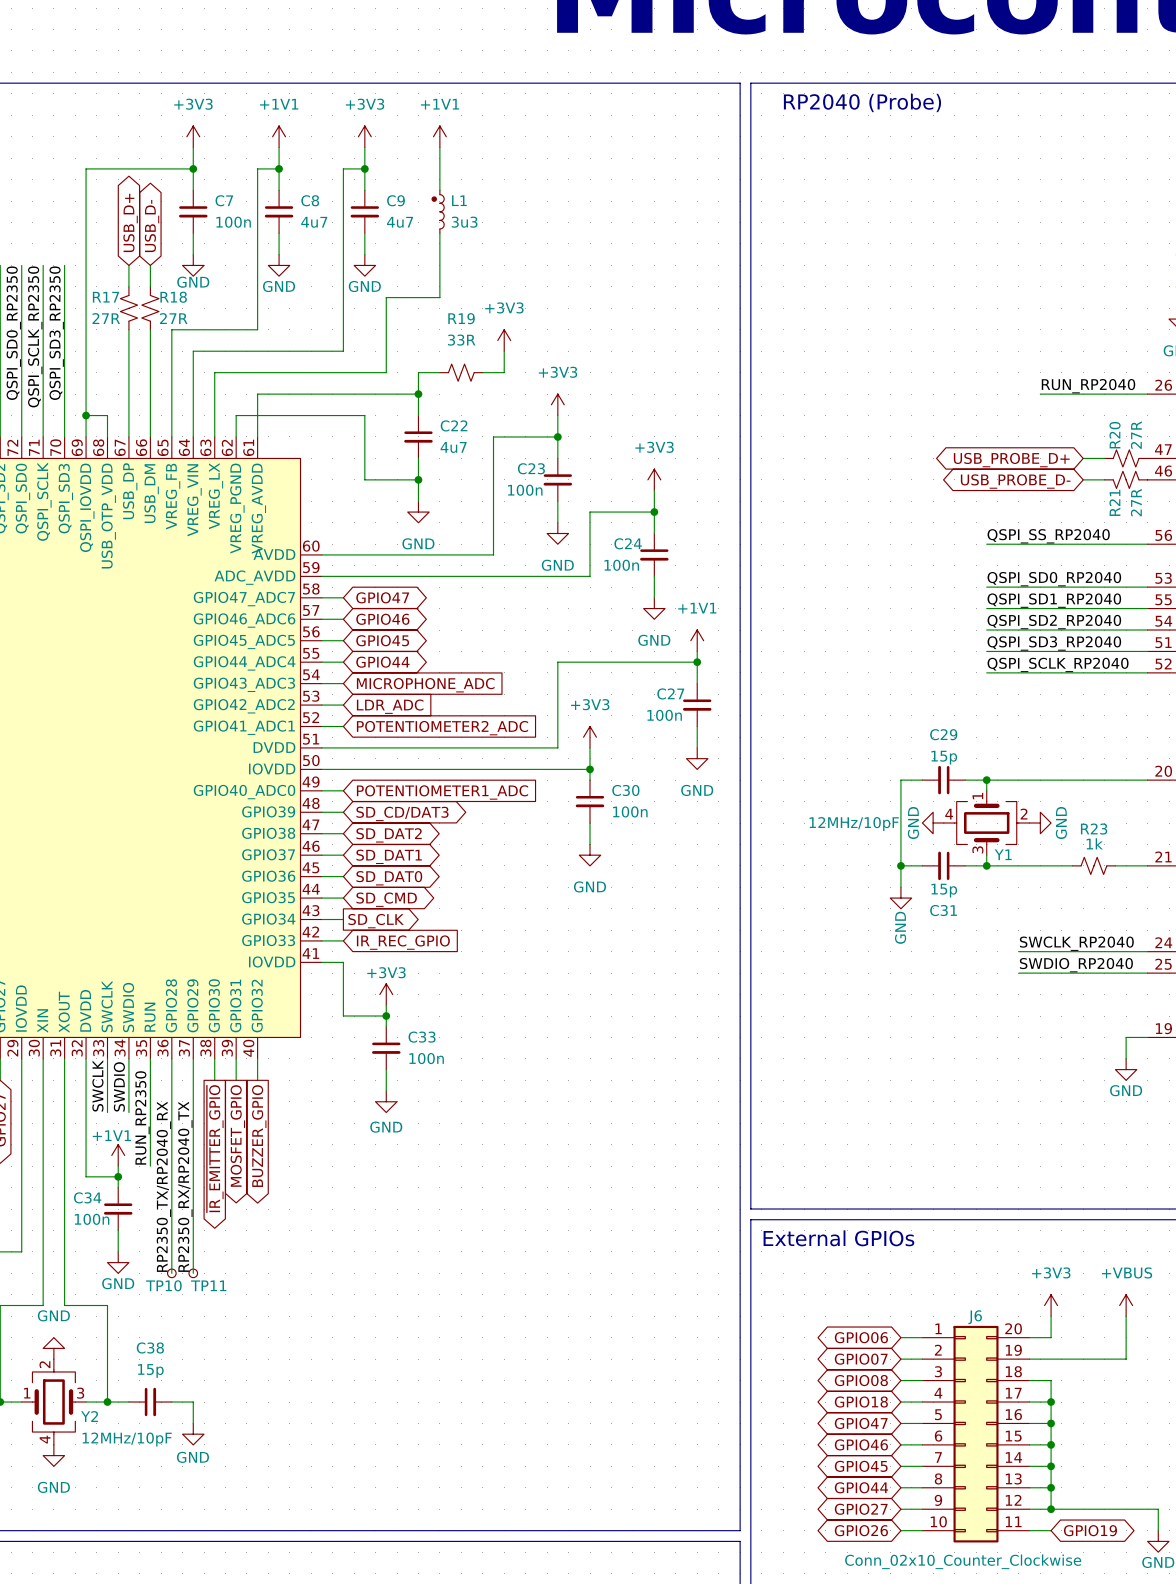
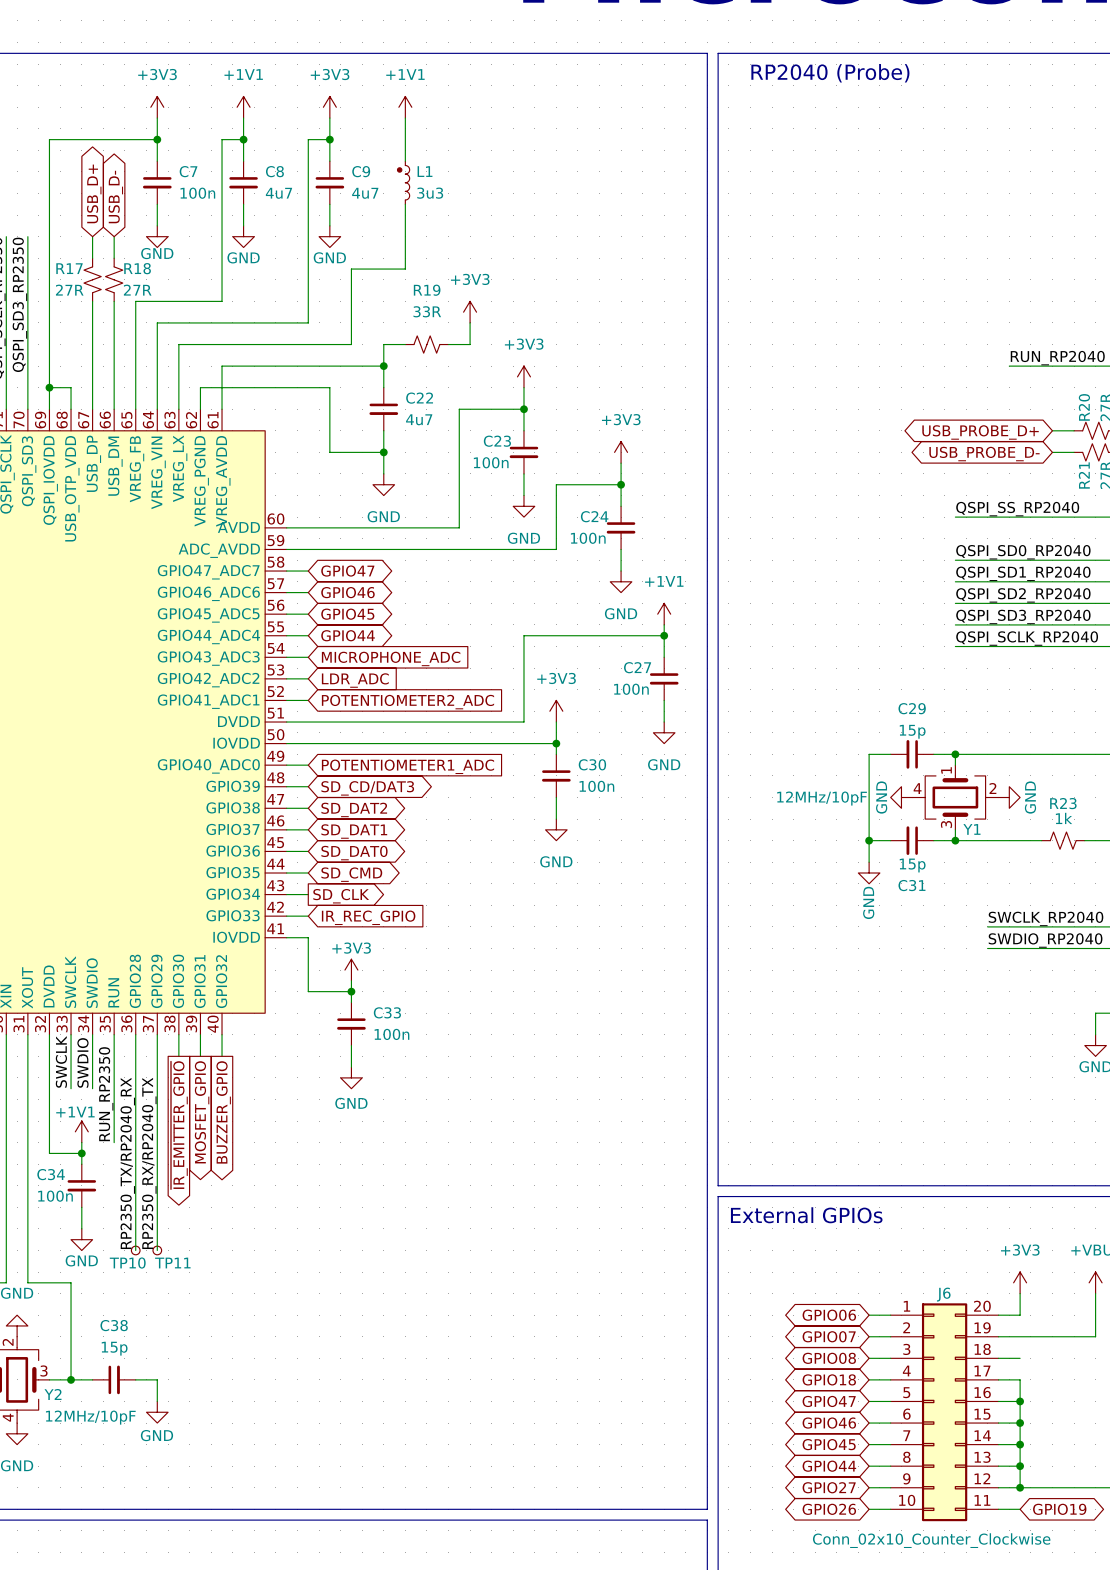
wire: (1051, 1380) (1051, 1402) -> none
junction: (1051, 1402) -> none

